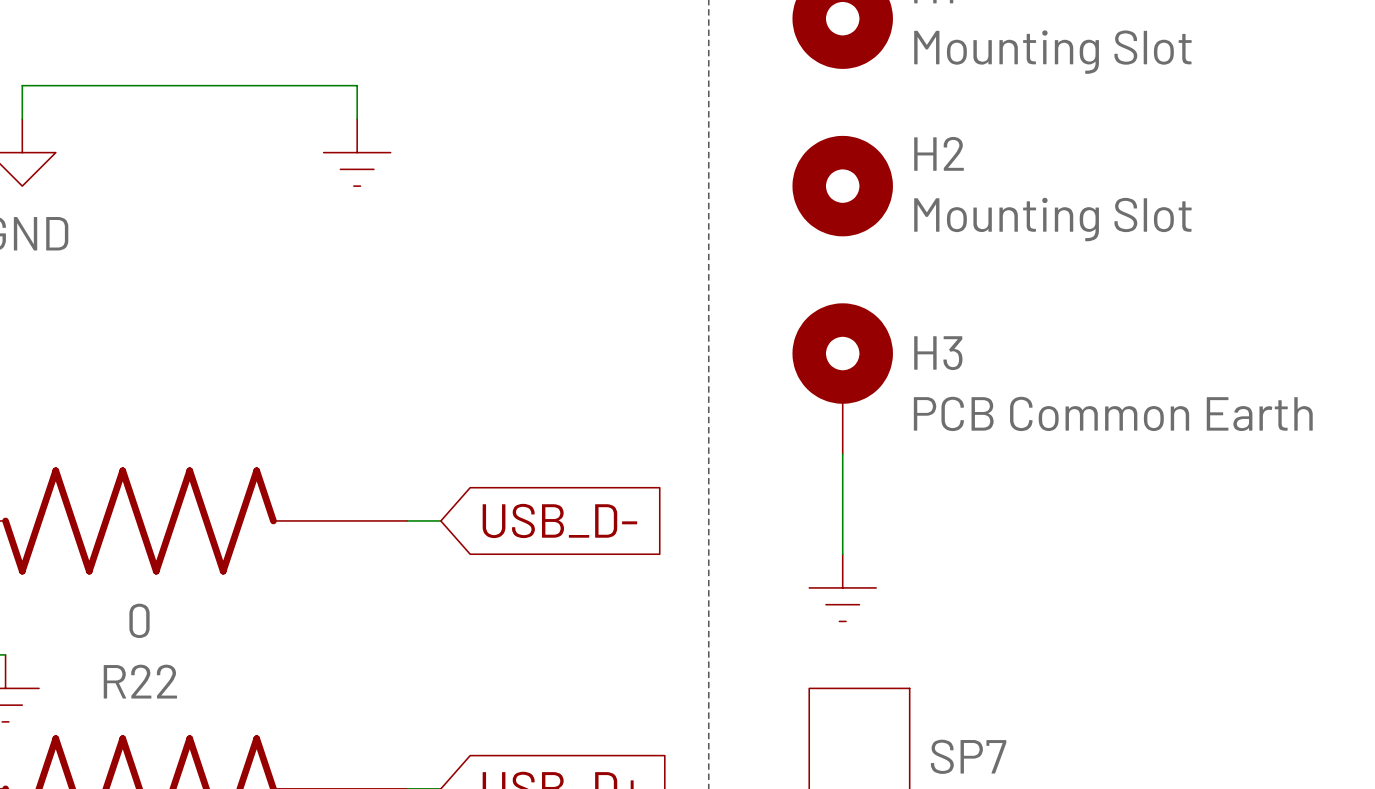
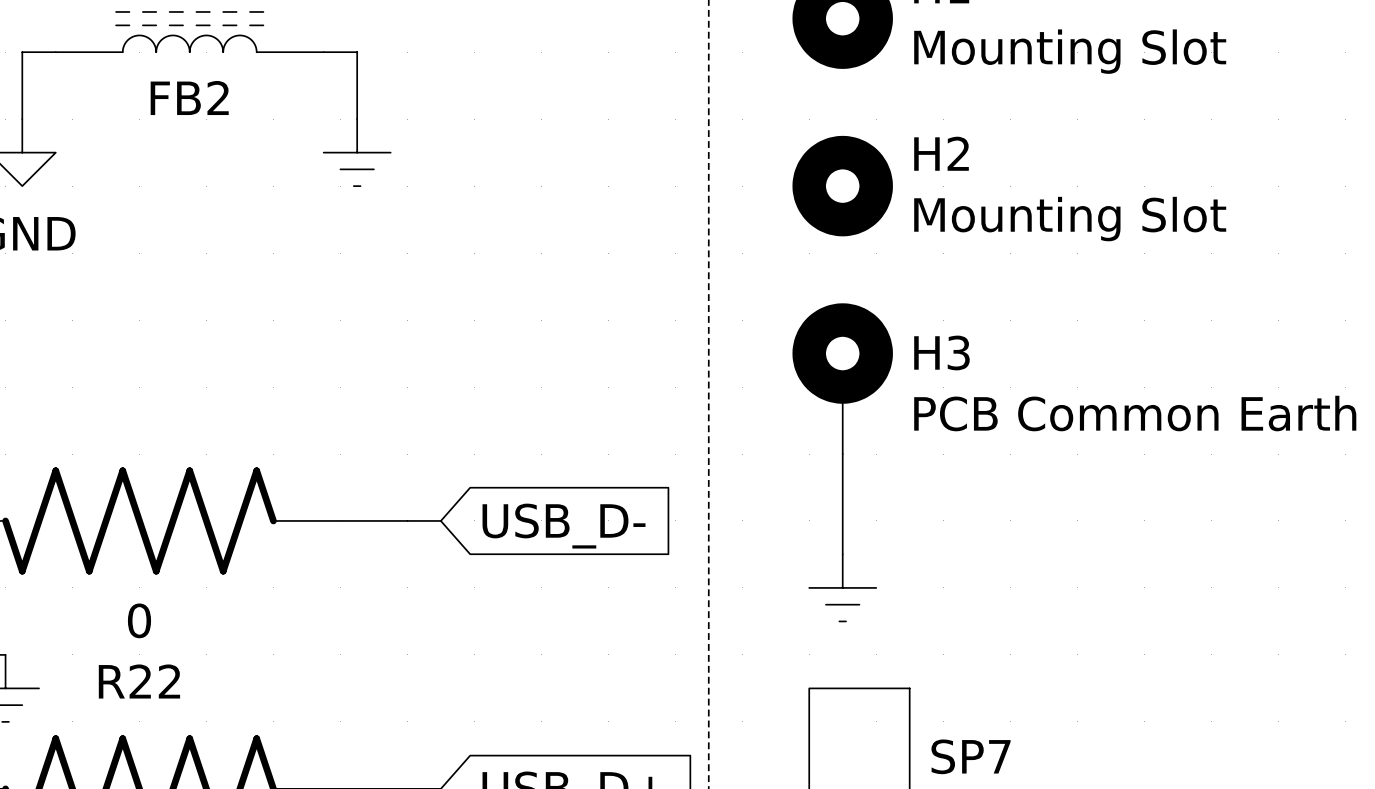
FB2: none -> (189, 32)
wire: none -> (323, 52) (357, 52) (357, 85)
wire: (22, 85) (357, 85) -> (22, 85) (22, 52) (55, 52)

